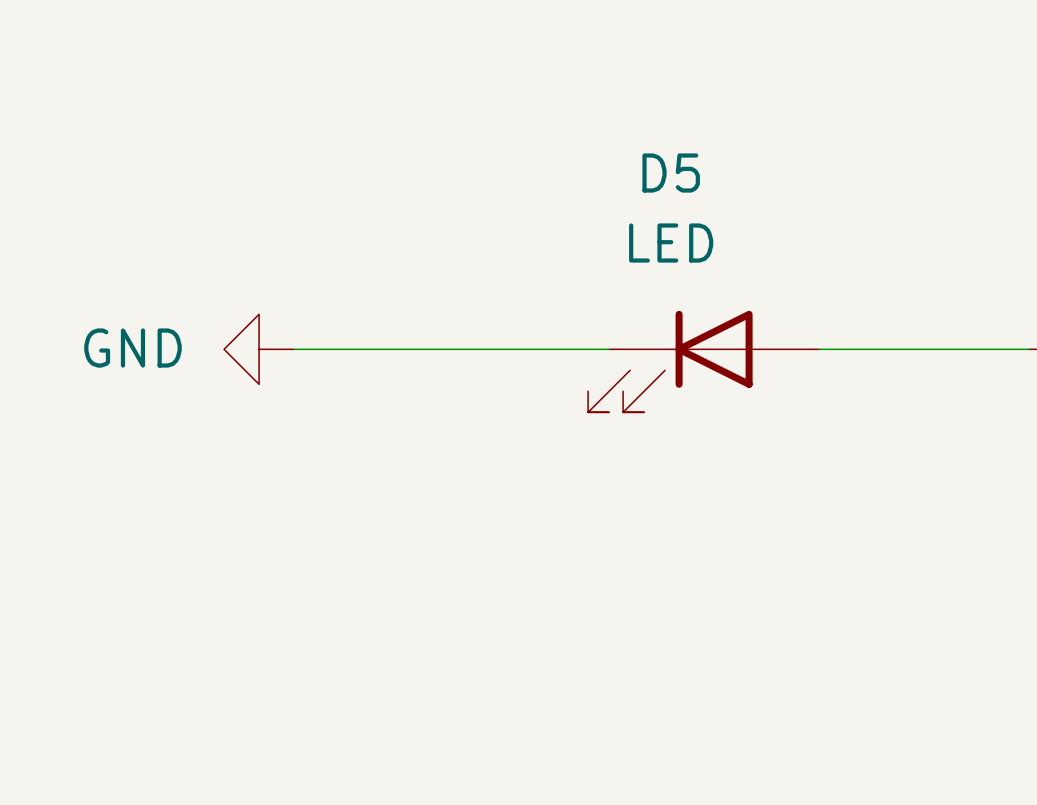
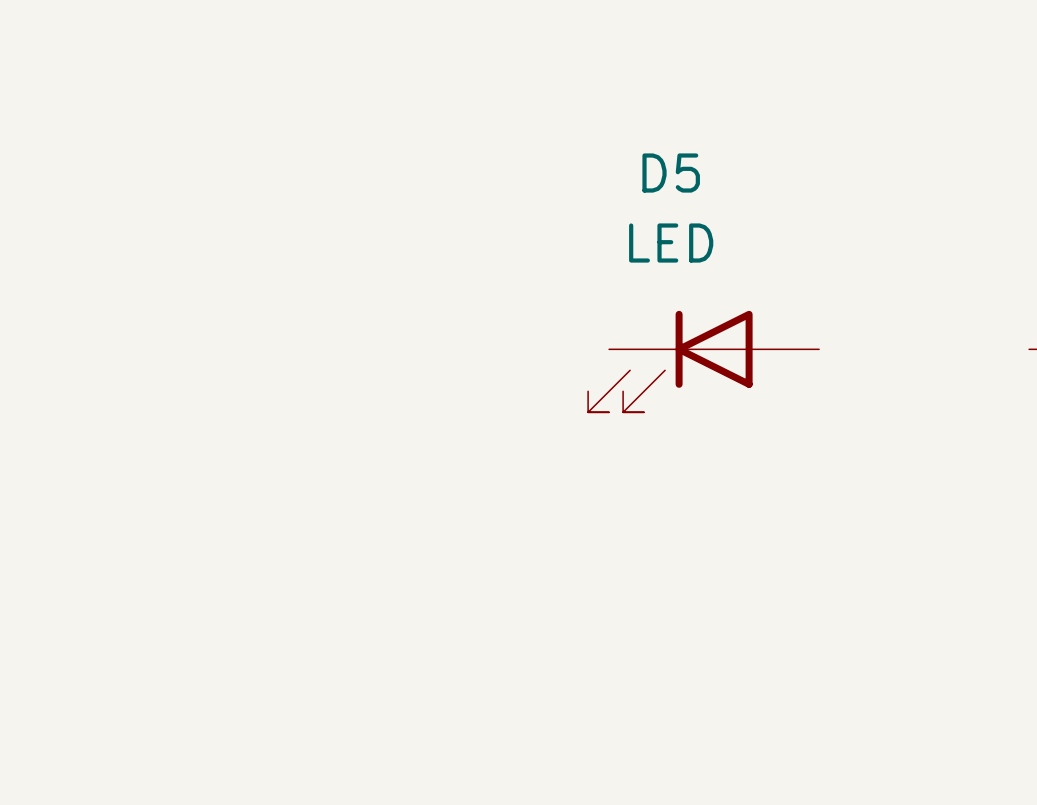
power symbol: GND (259, 349) -> none
wire: (294, 349) (609, 349) -> none
wire: (819, 349) (1029, 349) -> none

